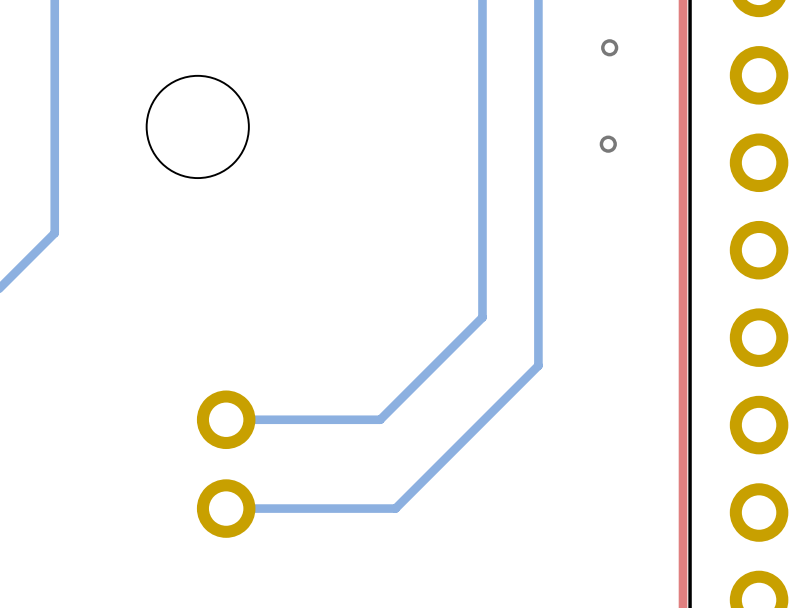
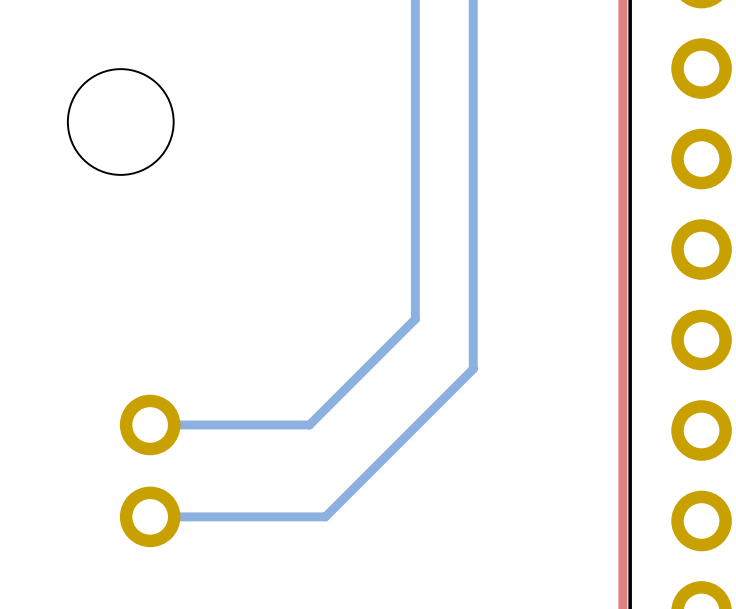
via: (609, 47) -> none
via: (608, 144) -> none

